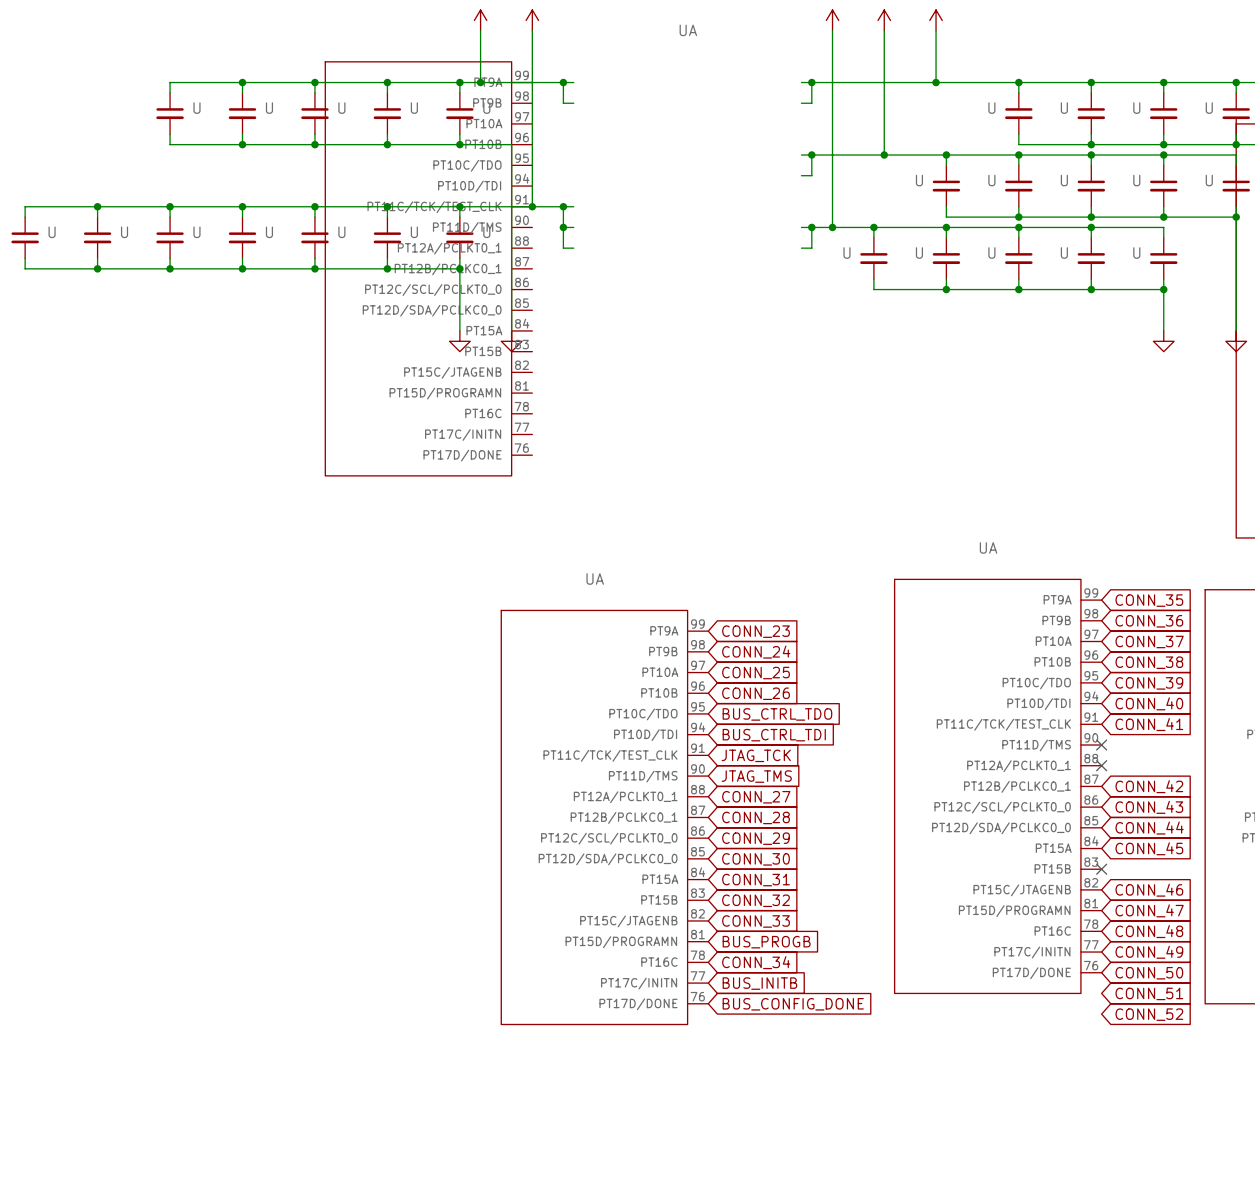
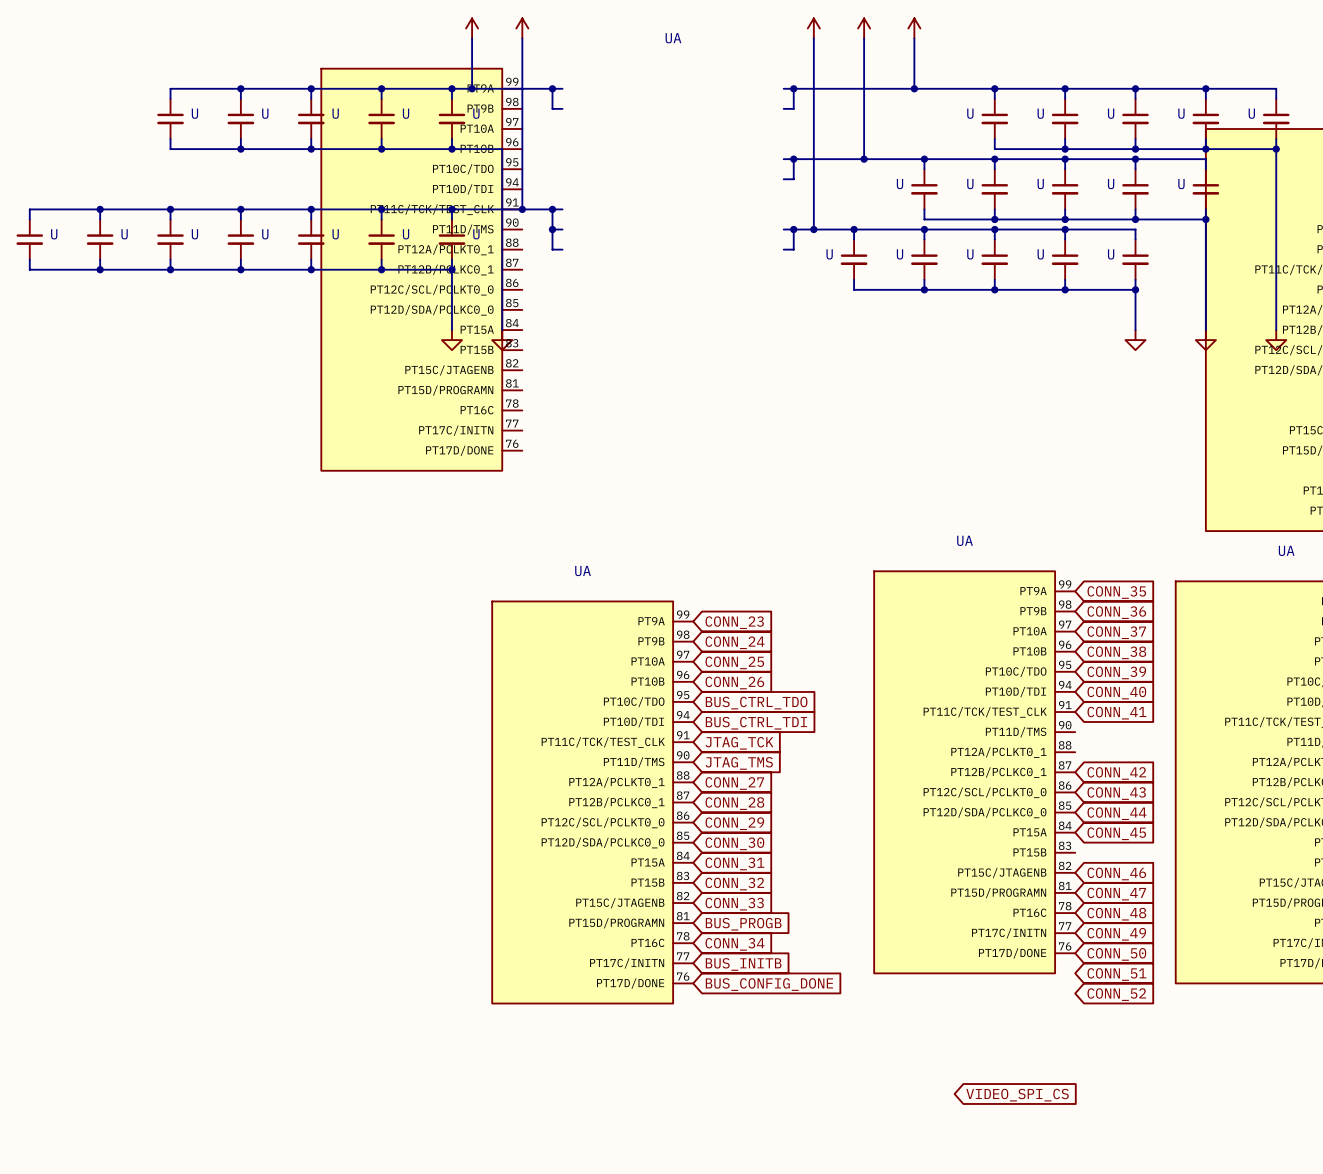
no-connect mark: (1101, 745) -> none
no-connect mark: (1101, 765) -> none
no-connect mark: (1101, 869) -> none
global label: none -> VIDEO_SPI_CS (1017, 1095)

